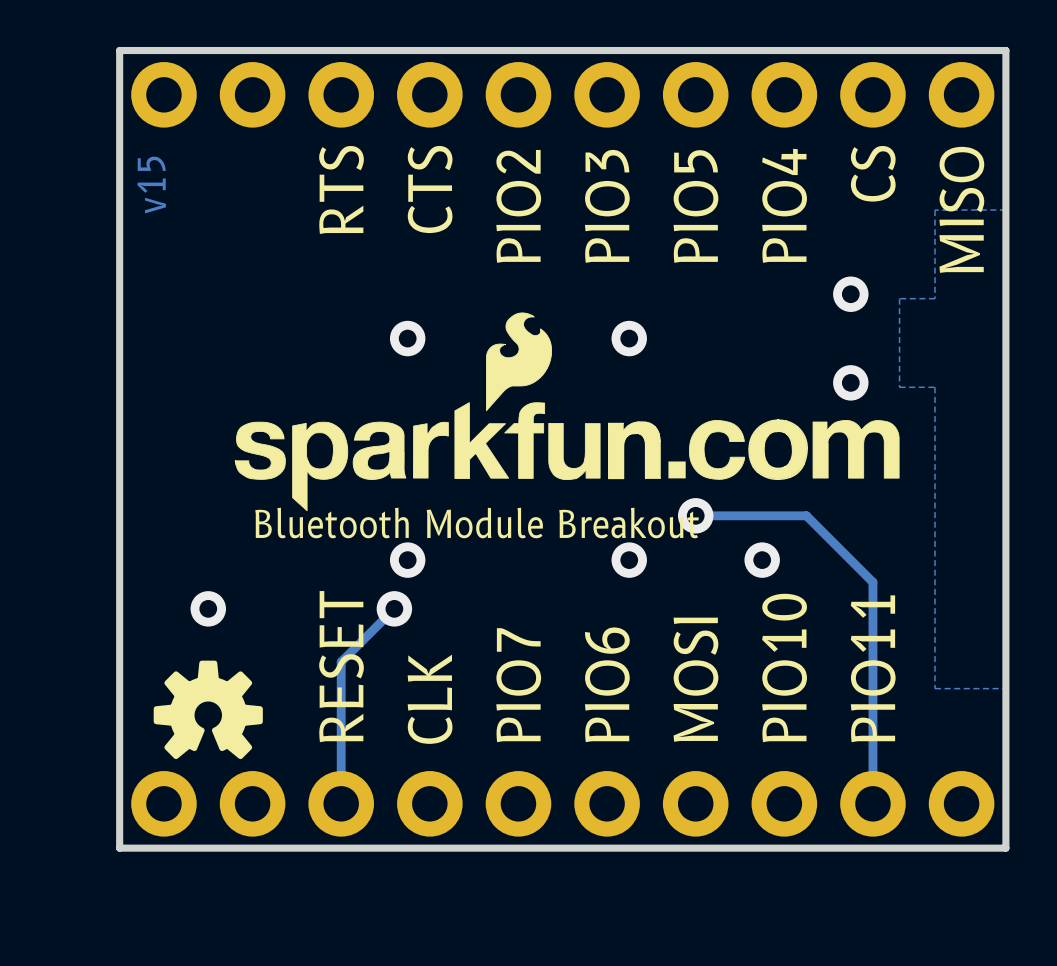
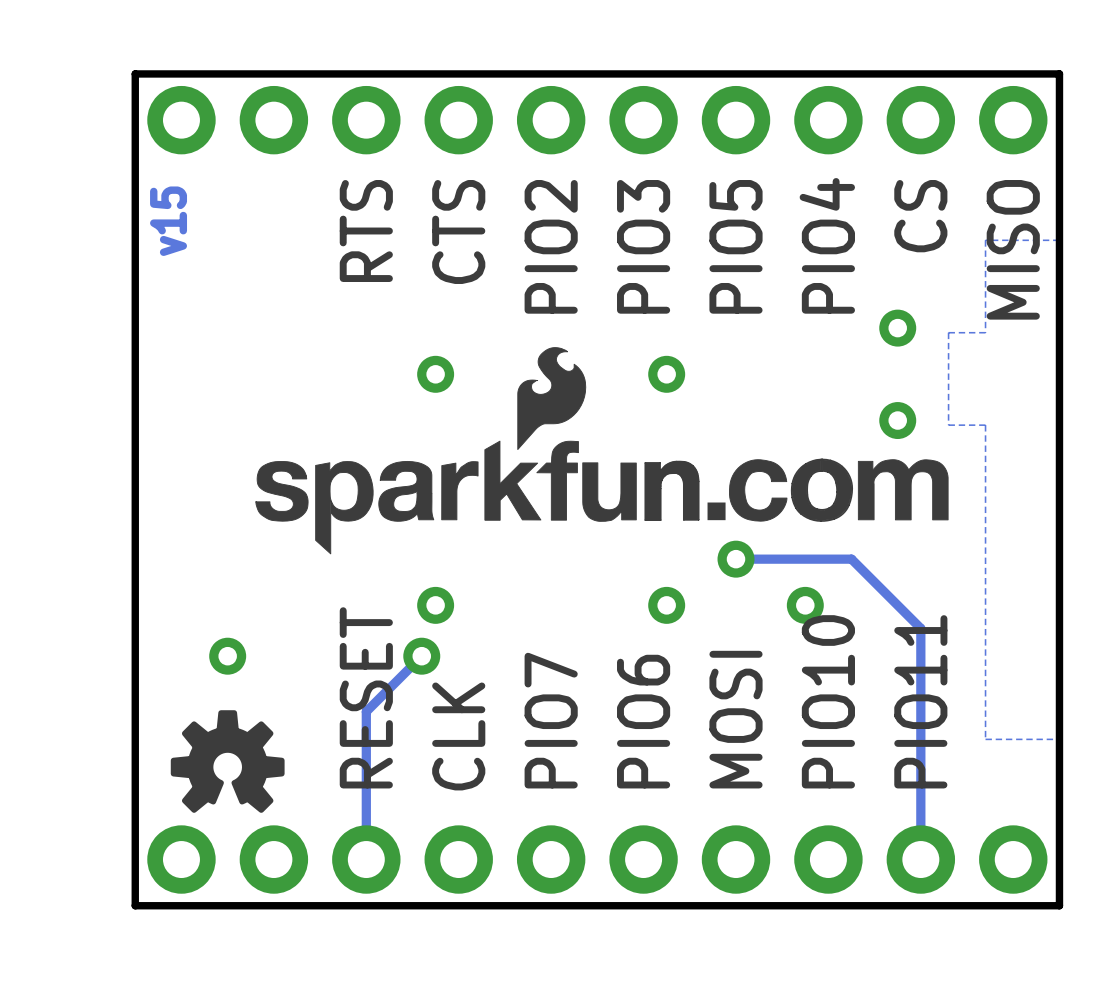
text: Bluetooth Module Breakout (477, 523) -> none

